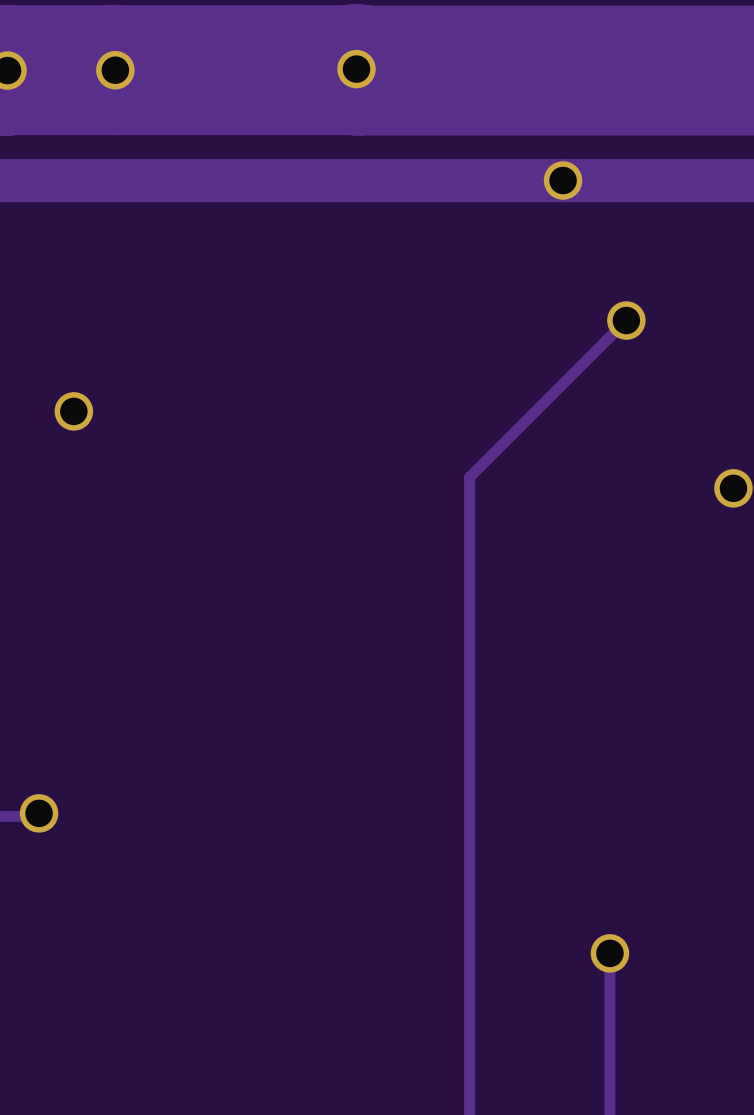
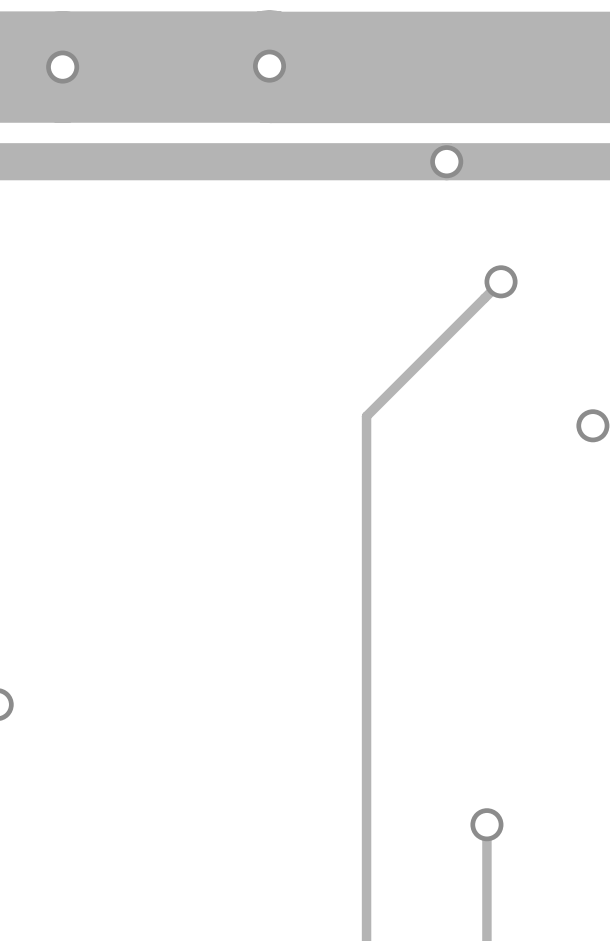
via: (73, 411) -> none

